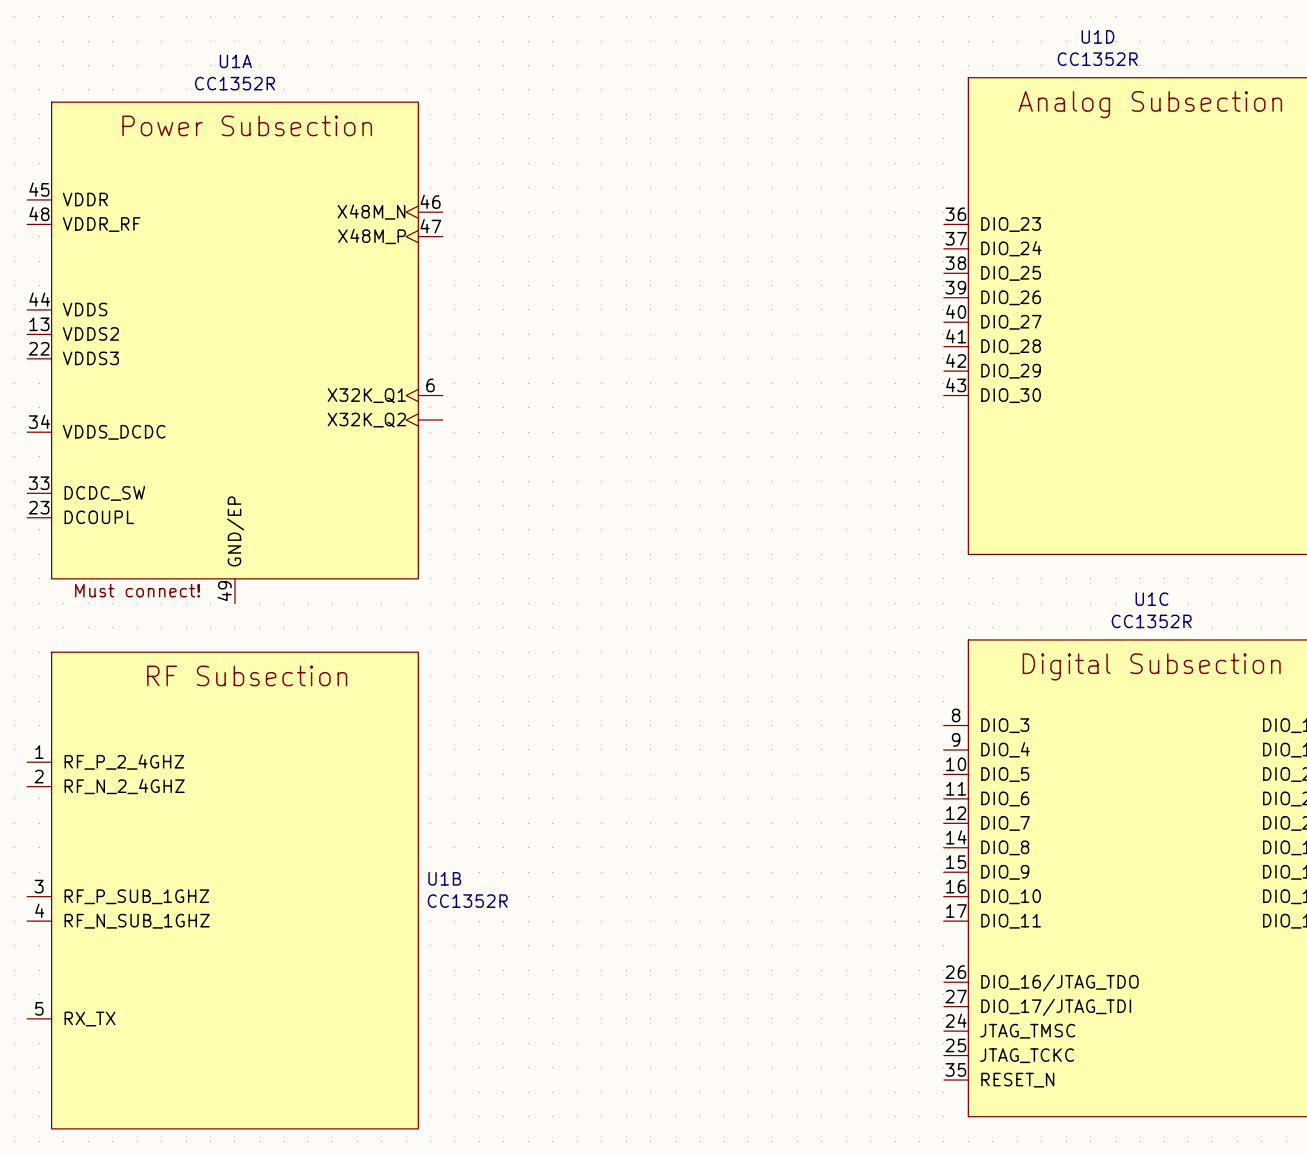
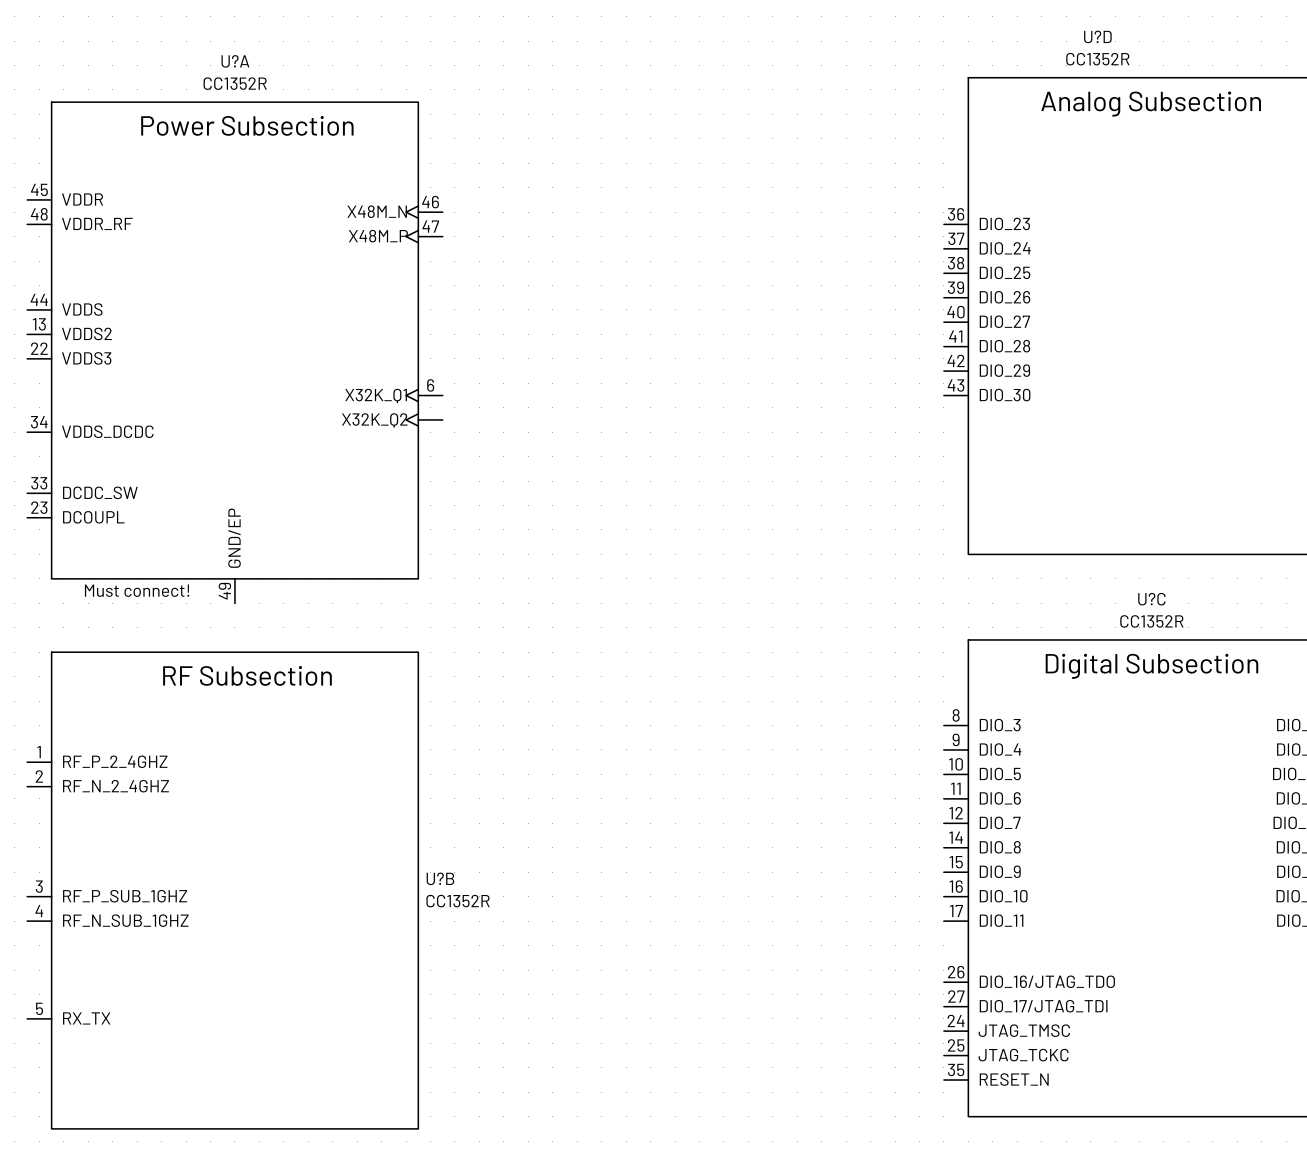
U1D name: U1D (1097, 36) -> U?D (1097, 36)
U1A name: U1A (235, 61) -> U?A (235, 61)
U1C name: U1C (1151, 599) -> U?C (1151, 599)
U1B name: U1B (444, 878) -> U?B (440, 878)

